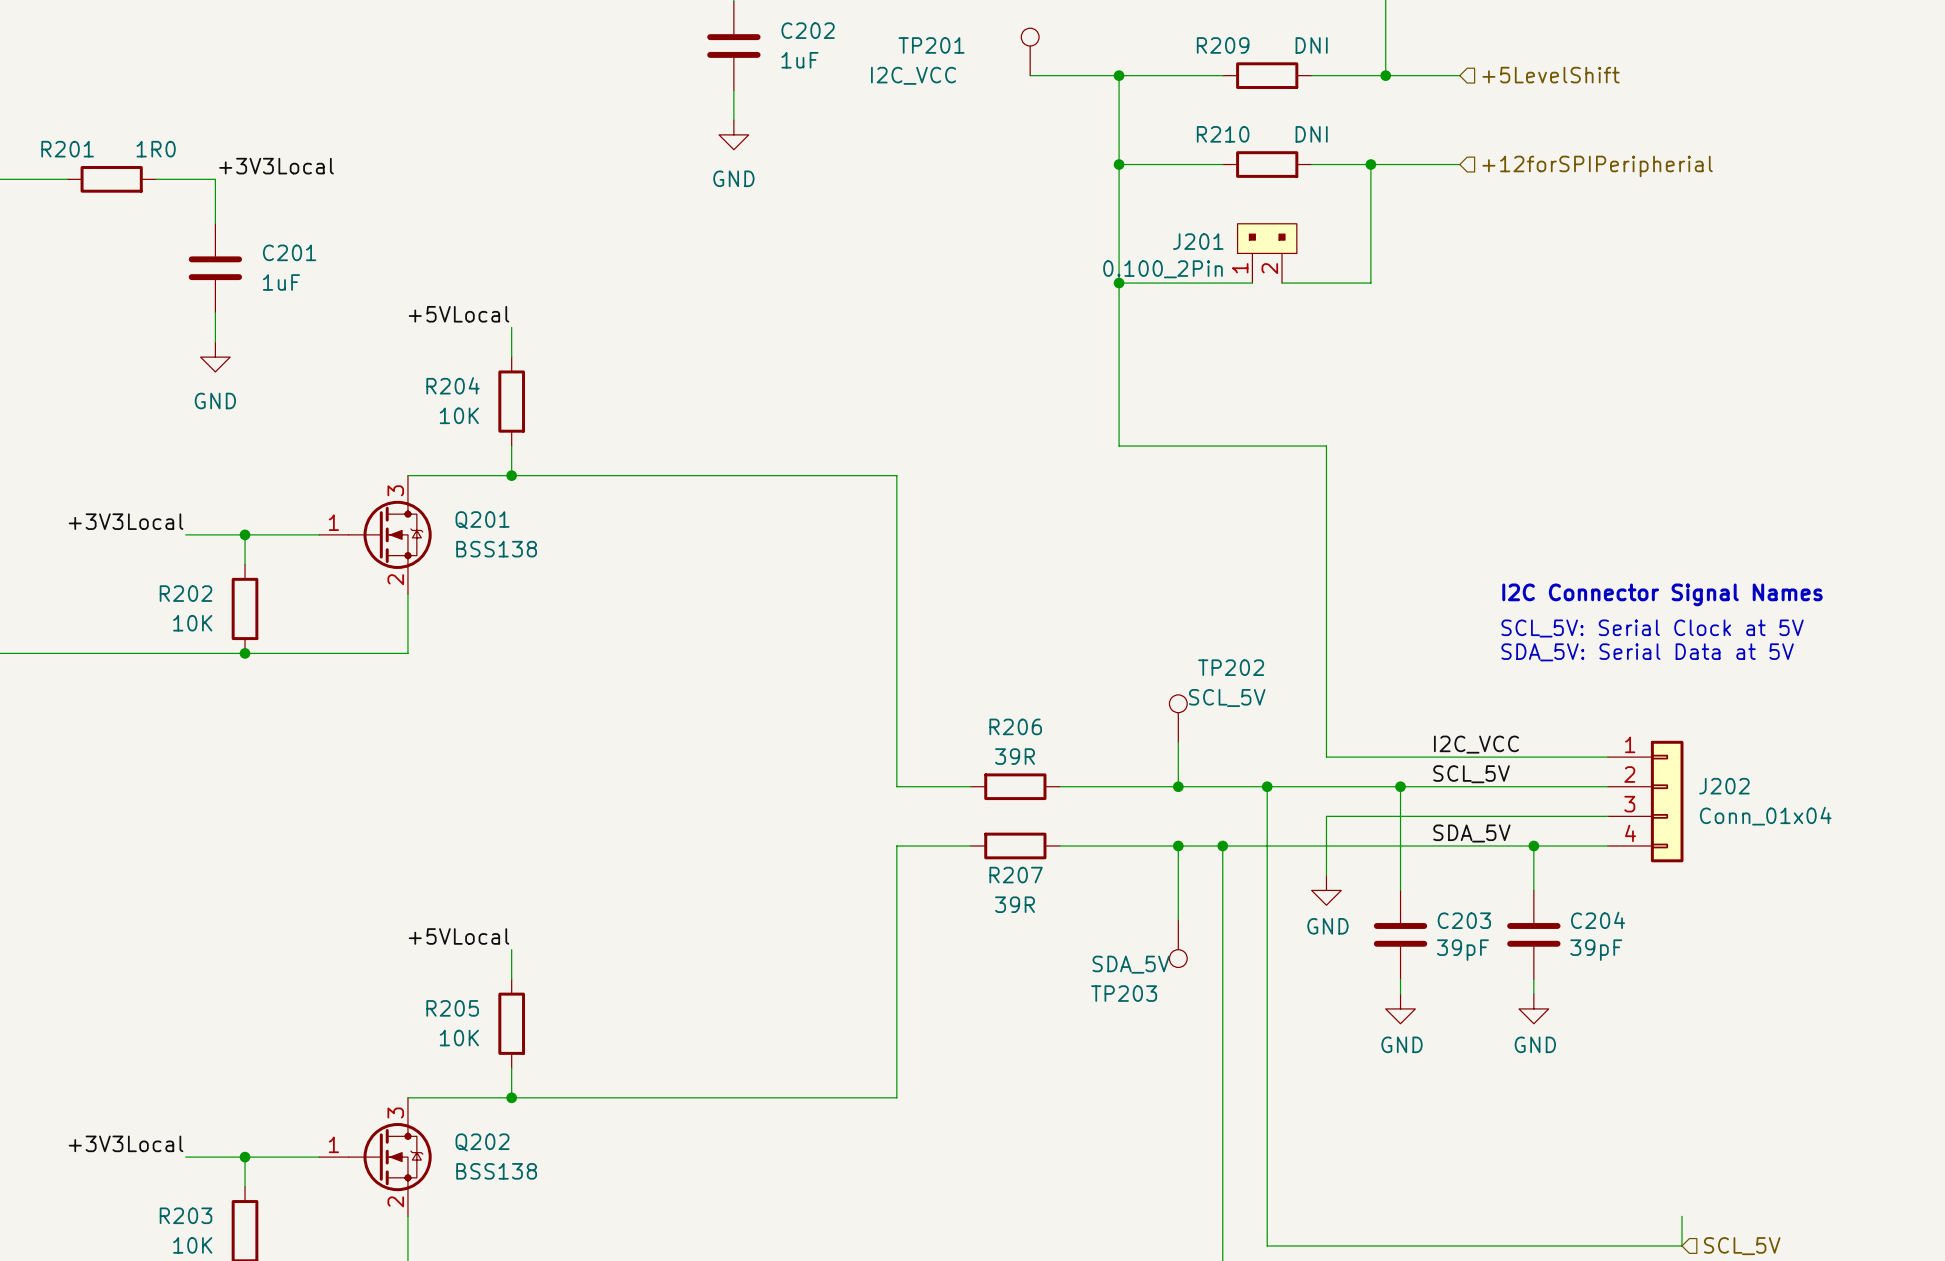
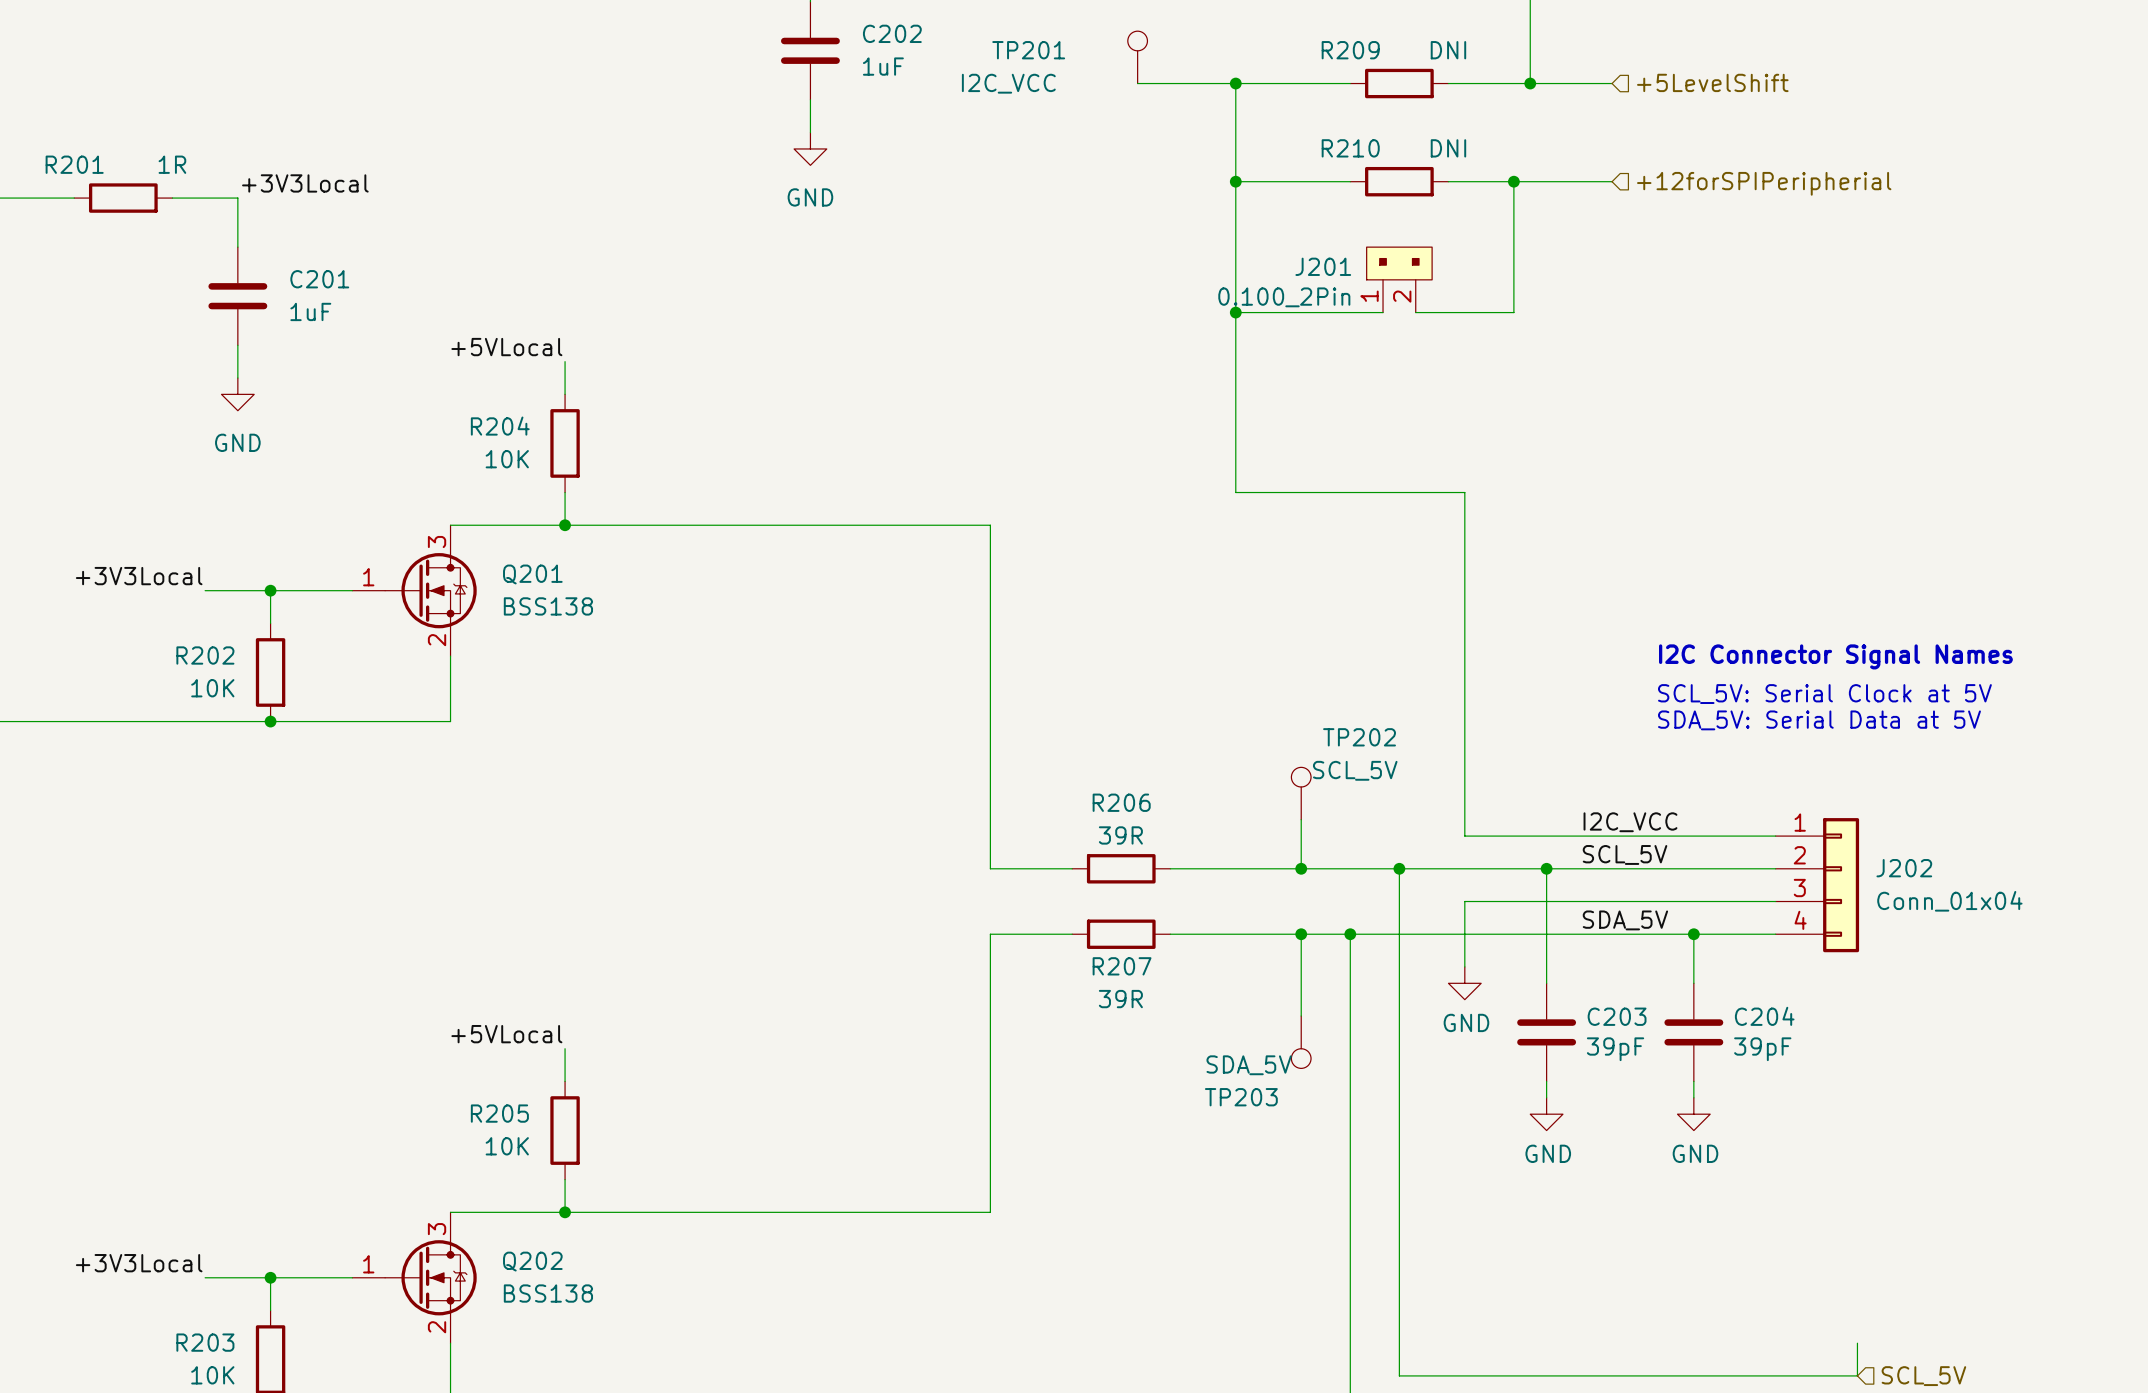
R201 value: 1R0 (156, 149) -> 1R (172, 164)

